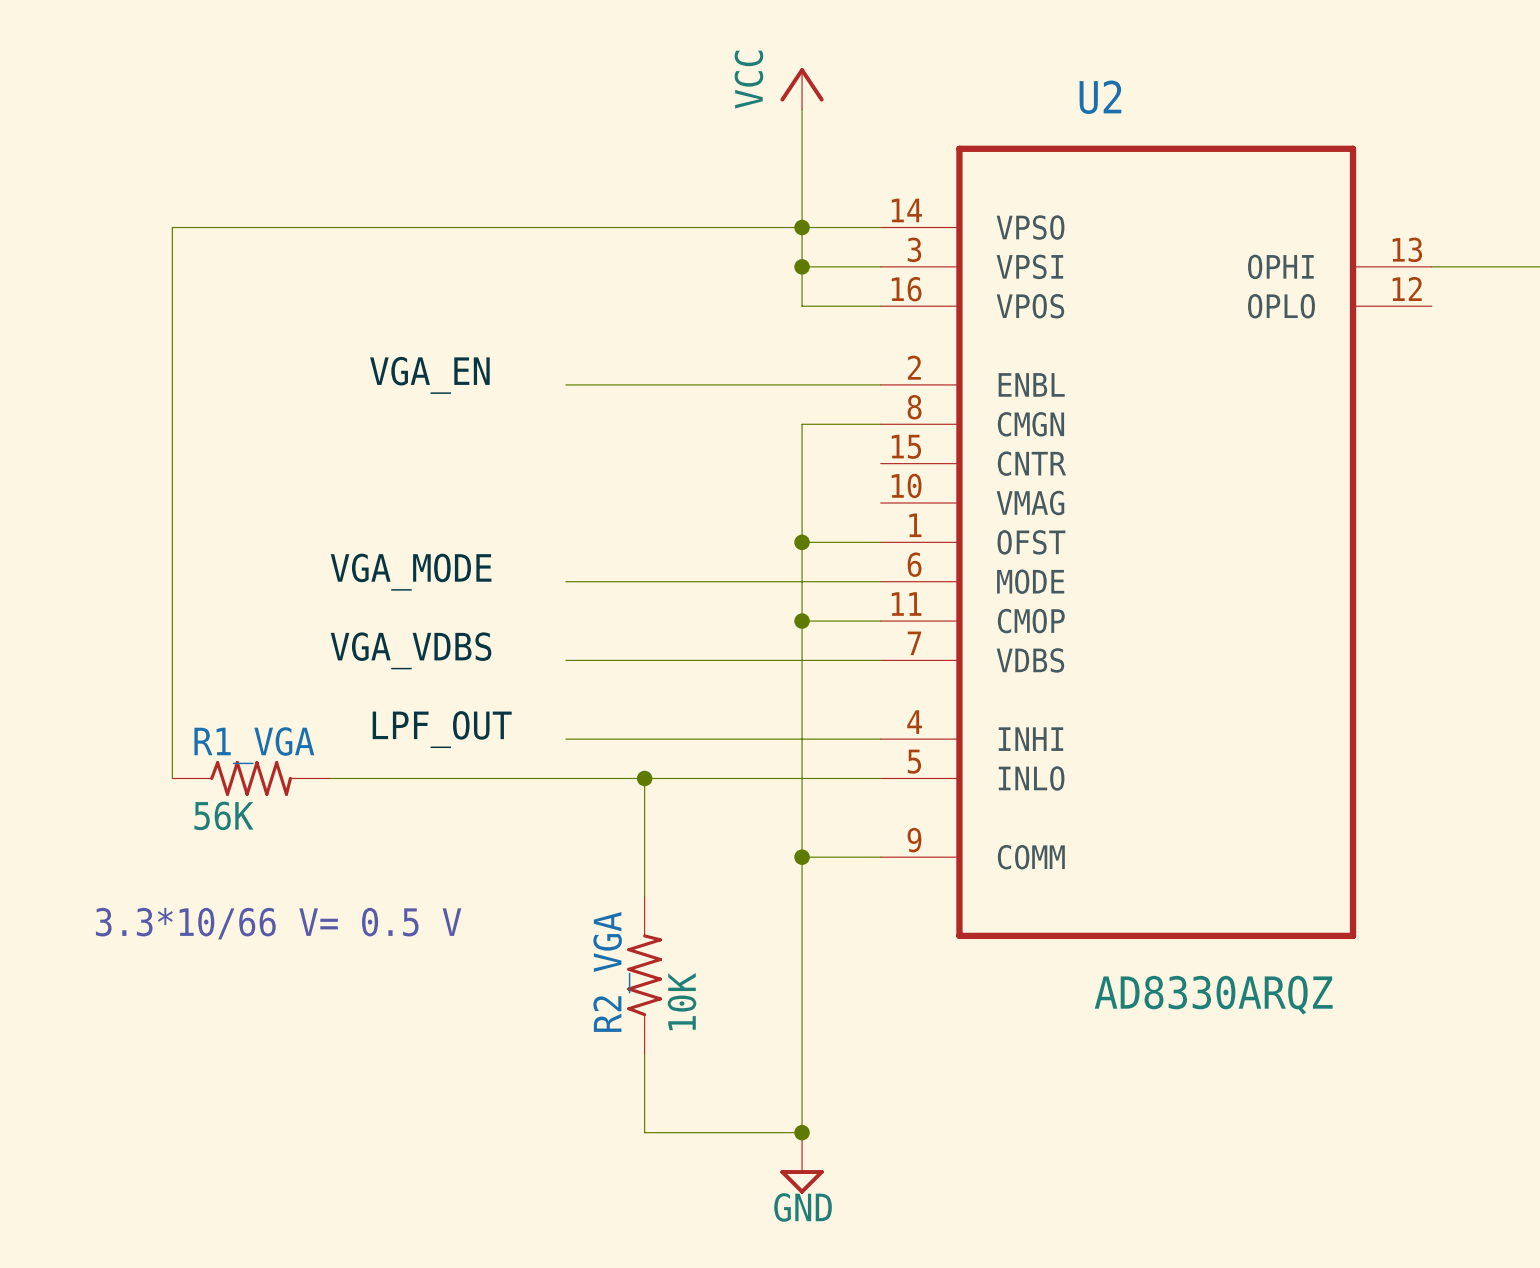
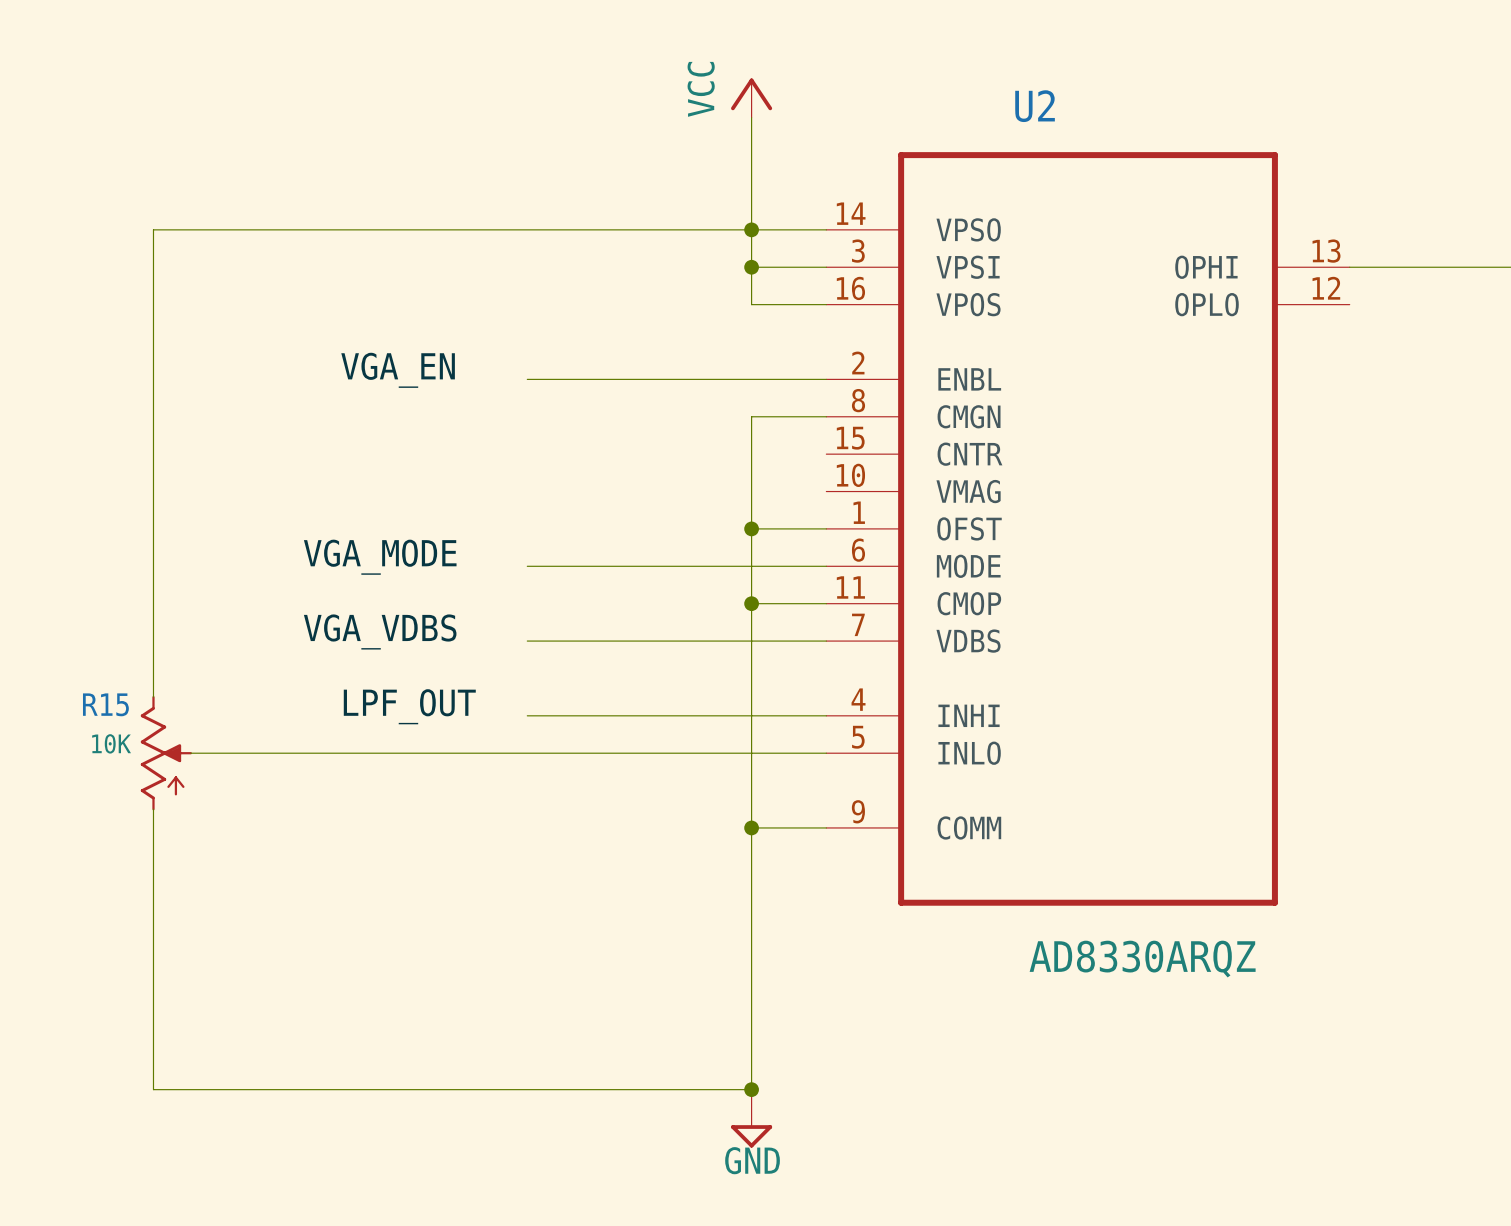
wire: (172, 719) (172, 778) -> none
R15: none -> 10K (166, 753)
R1_VGA: 56K (251, 778) -> none
wire: (644, 778) (644, 896) -> none
junction: (644, 778) -> none
text: 3.3*10/66 V= 0.5 V (278, 923) -> none
R2_VGA: 10K (644, 975) -> none
wire: (644, 1053) (644, 1132) -> (153, 809) (153, 1089) (602, 1089)

